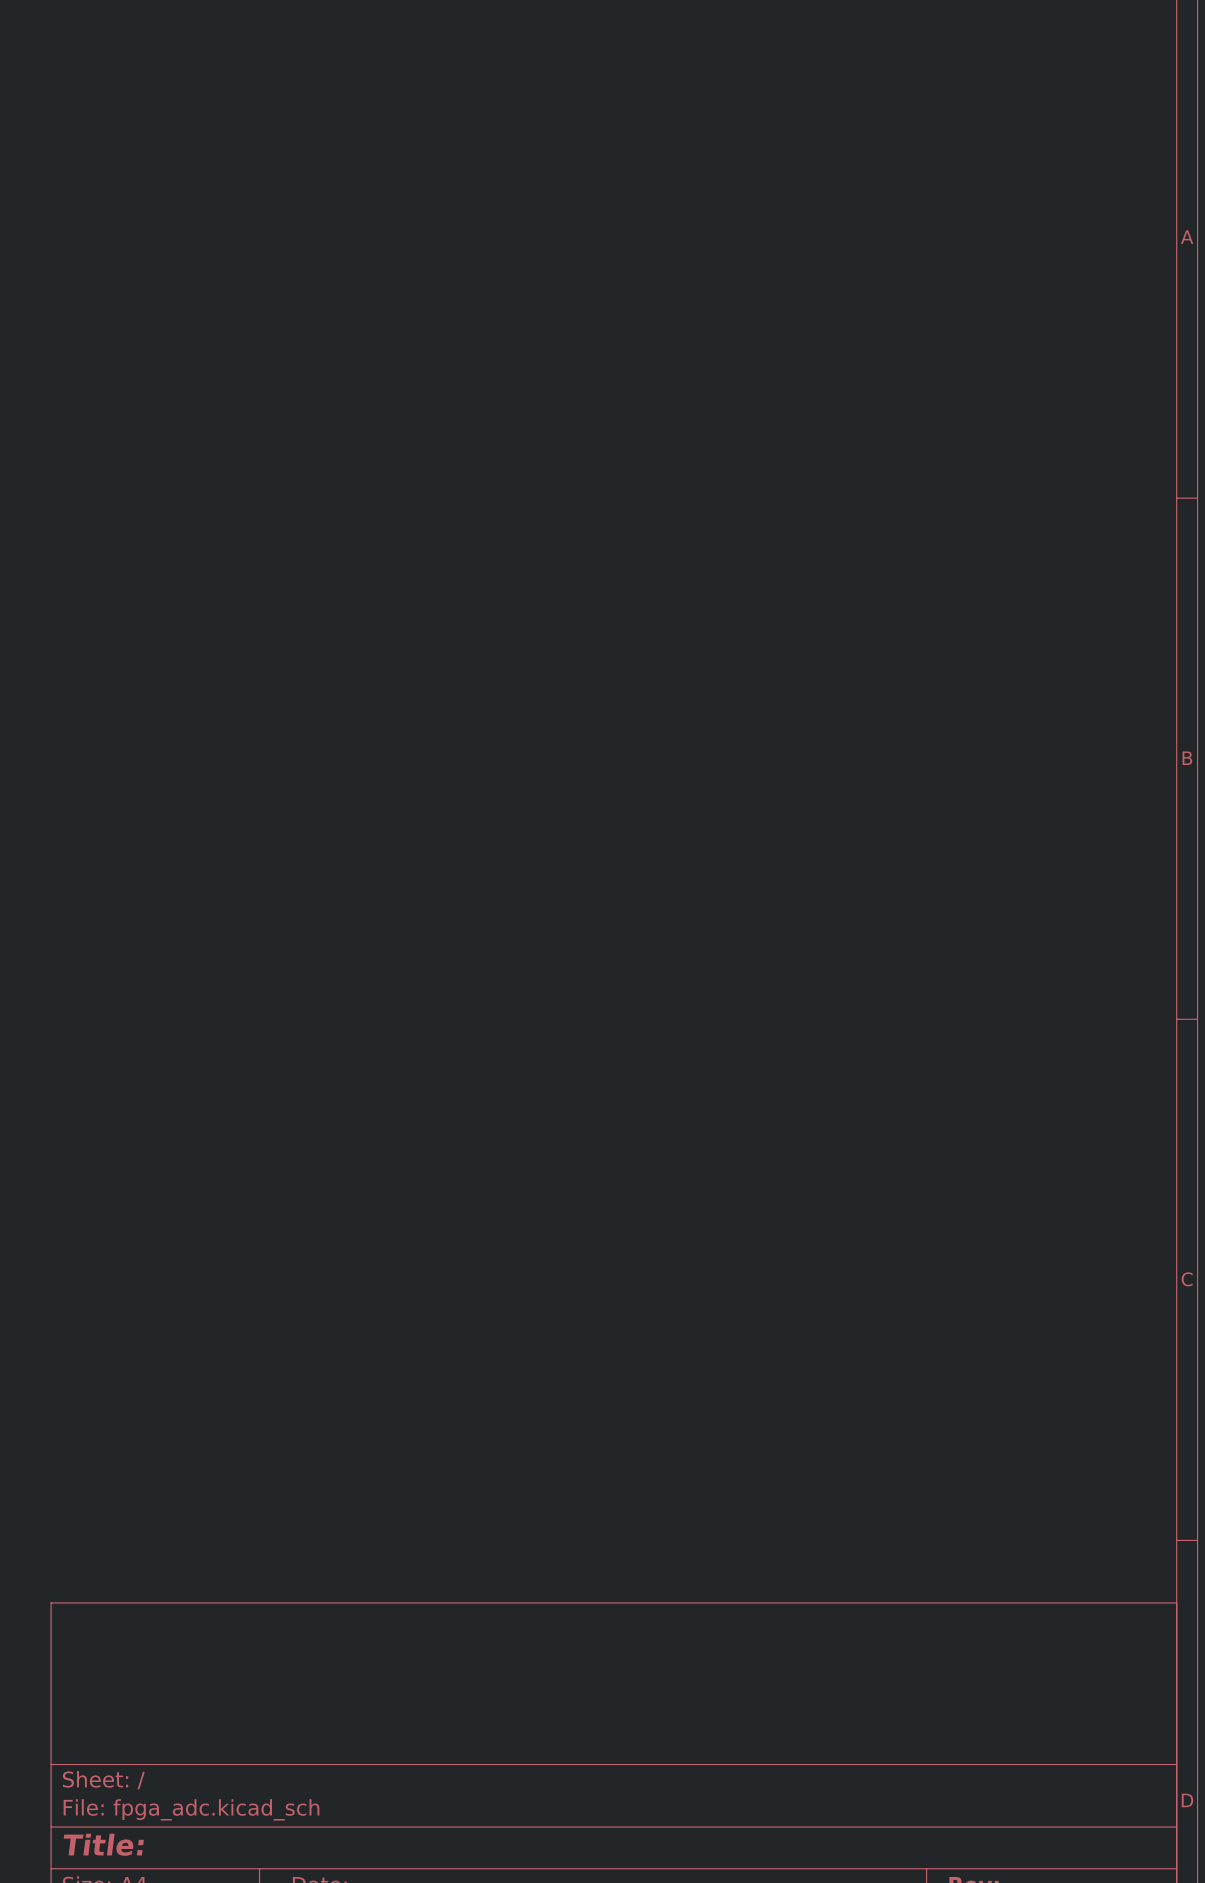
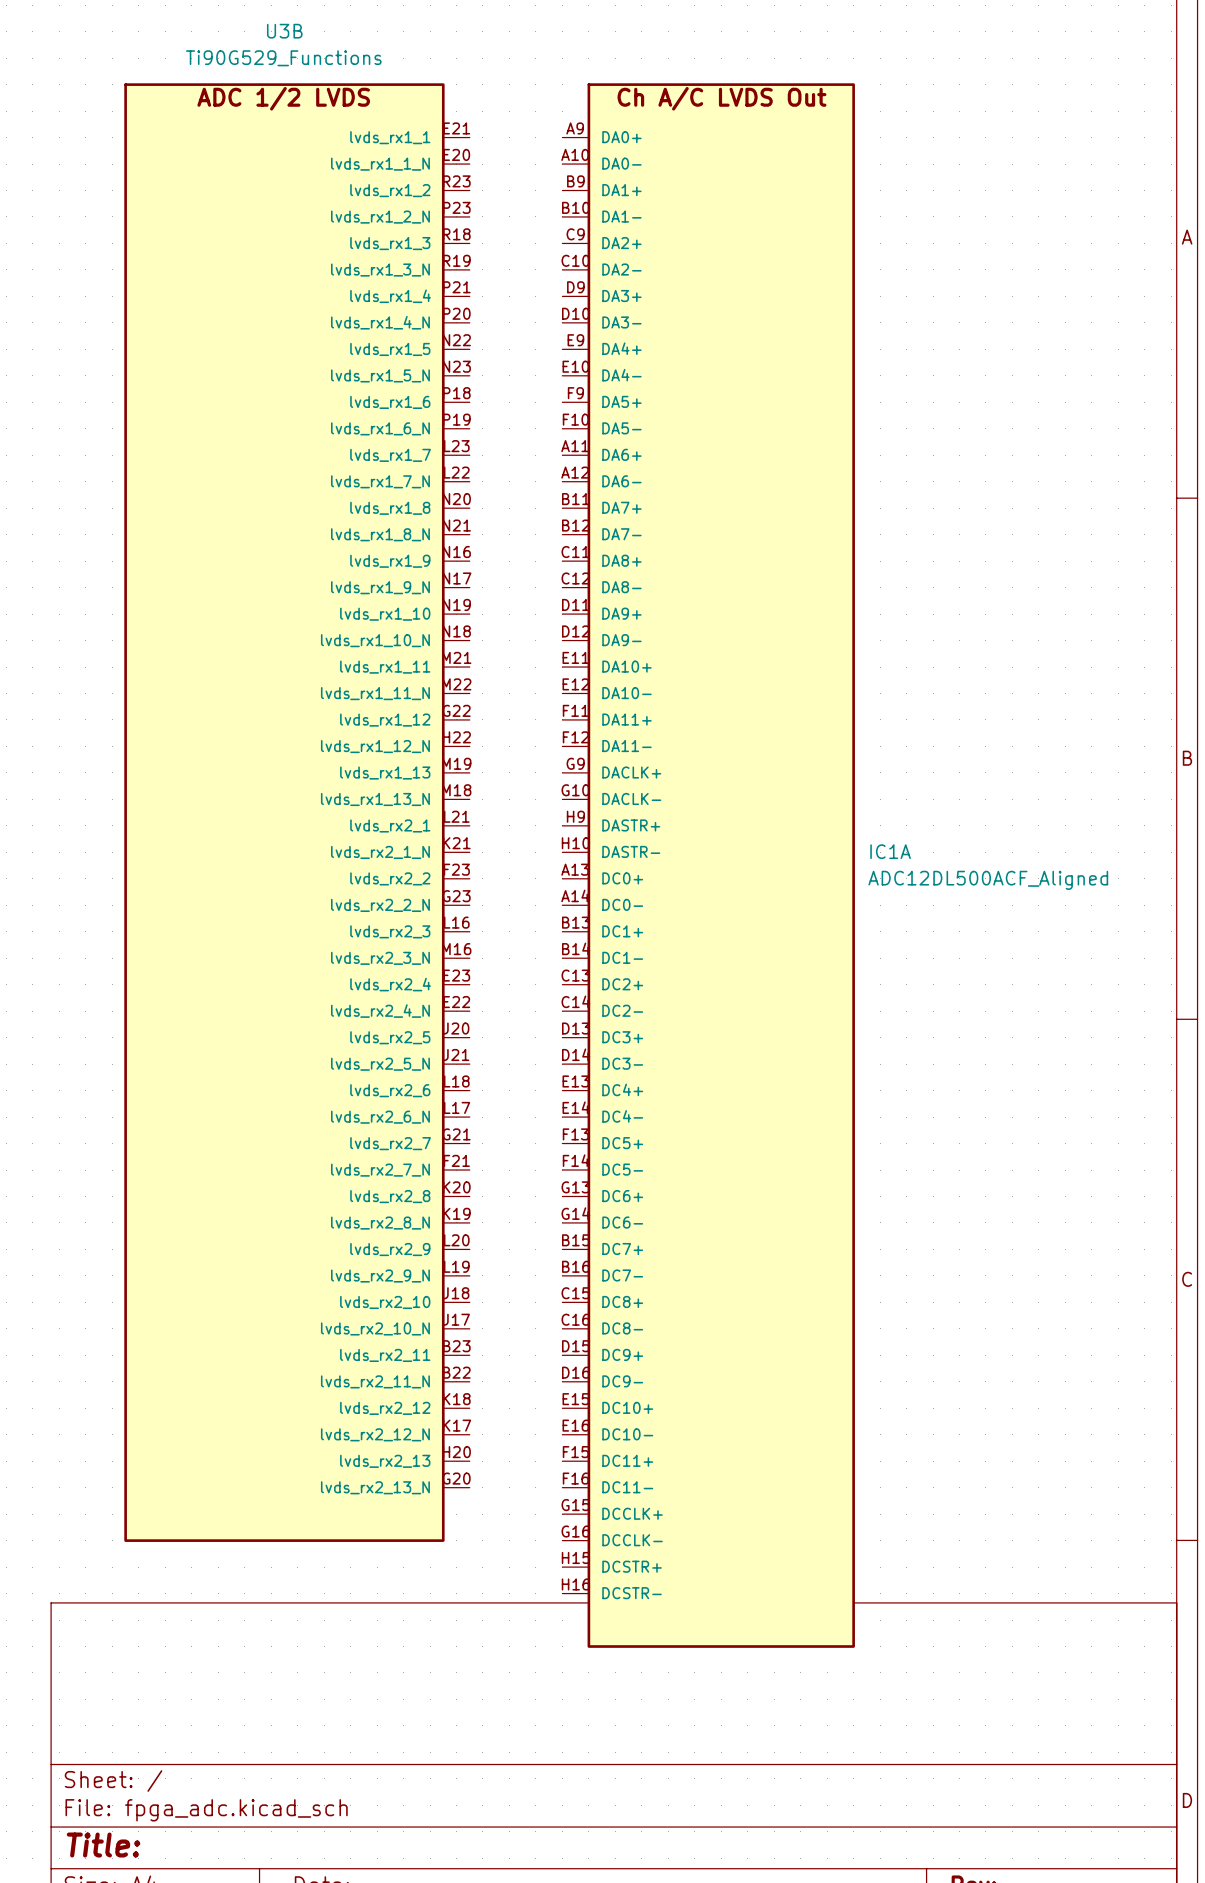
U3B: none -> Ti90G529_Functions (297, 812)
IC1A: none -> ADC12DL500ACF_Aligned (708, 865)

